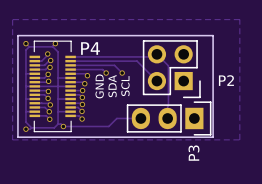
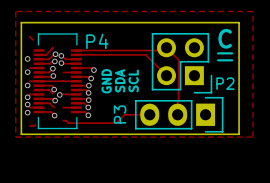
board edge: (17, 35) (213, 35) (213, 137) -> (21, 28) (21, 22) (239, 22) (239, 134) (225, 134)
via: (25, 43) -> none
track: (55, 43) (52, 46) (58, 51) (58, 124) (54, 127) (31, 127) (25, 122) (25, 50) (29, 46) (52, 46) -> none
via: (55, 43) -> none
text: none -> C (225, 38)
via: (47, 53) -> none
line: none -> (218, 53) (232, 53)
via: none -> (61, 55)
via: none -> (27, 58)
track: (70, 65) (114, 65) (122, 73) -> (76, 59) (65, 59) (61, 55)
line: none -> (218, 60) (232, 60)
via: none -> (61, 63)
track: (70, 69) (102, 69) (106, 73) -> (76, 63) (61, 63)
via: (106, 73) -> none
via: (122, 73) -> none
via: none -> (27, 72)
P2 name position: P2 (226, 80) -> P2 (225, 83)
via: none -> (27, 85)
via: (48, 91) -> none
via: none -> (54, 89)
via: (48, 98) -> none
via: none -> (59, 94)
via: none -> (27, 97)
via: none -> (27, 104)
via: (49, 111) -> none
via: none -> (27, 112)
via: (63, 126) -> none
via: (25, 129) -> none
P3 name position: P3 (193, 153) -> P3 (120, 114)

